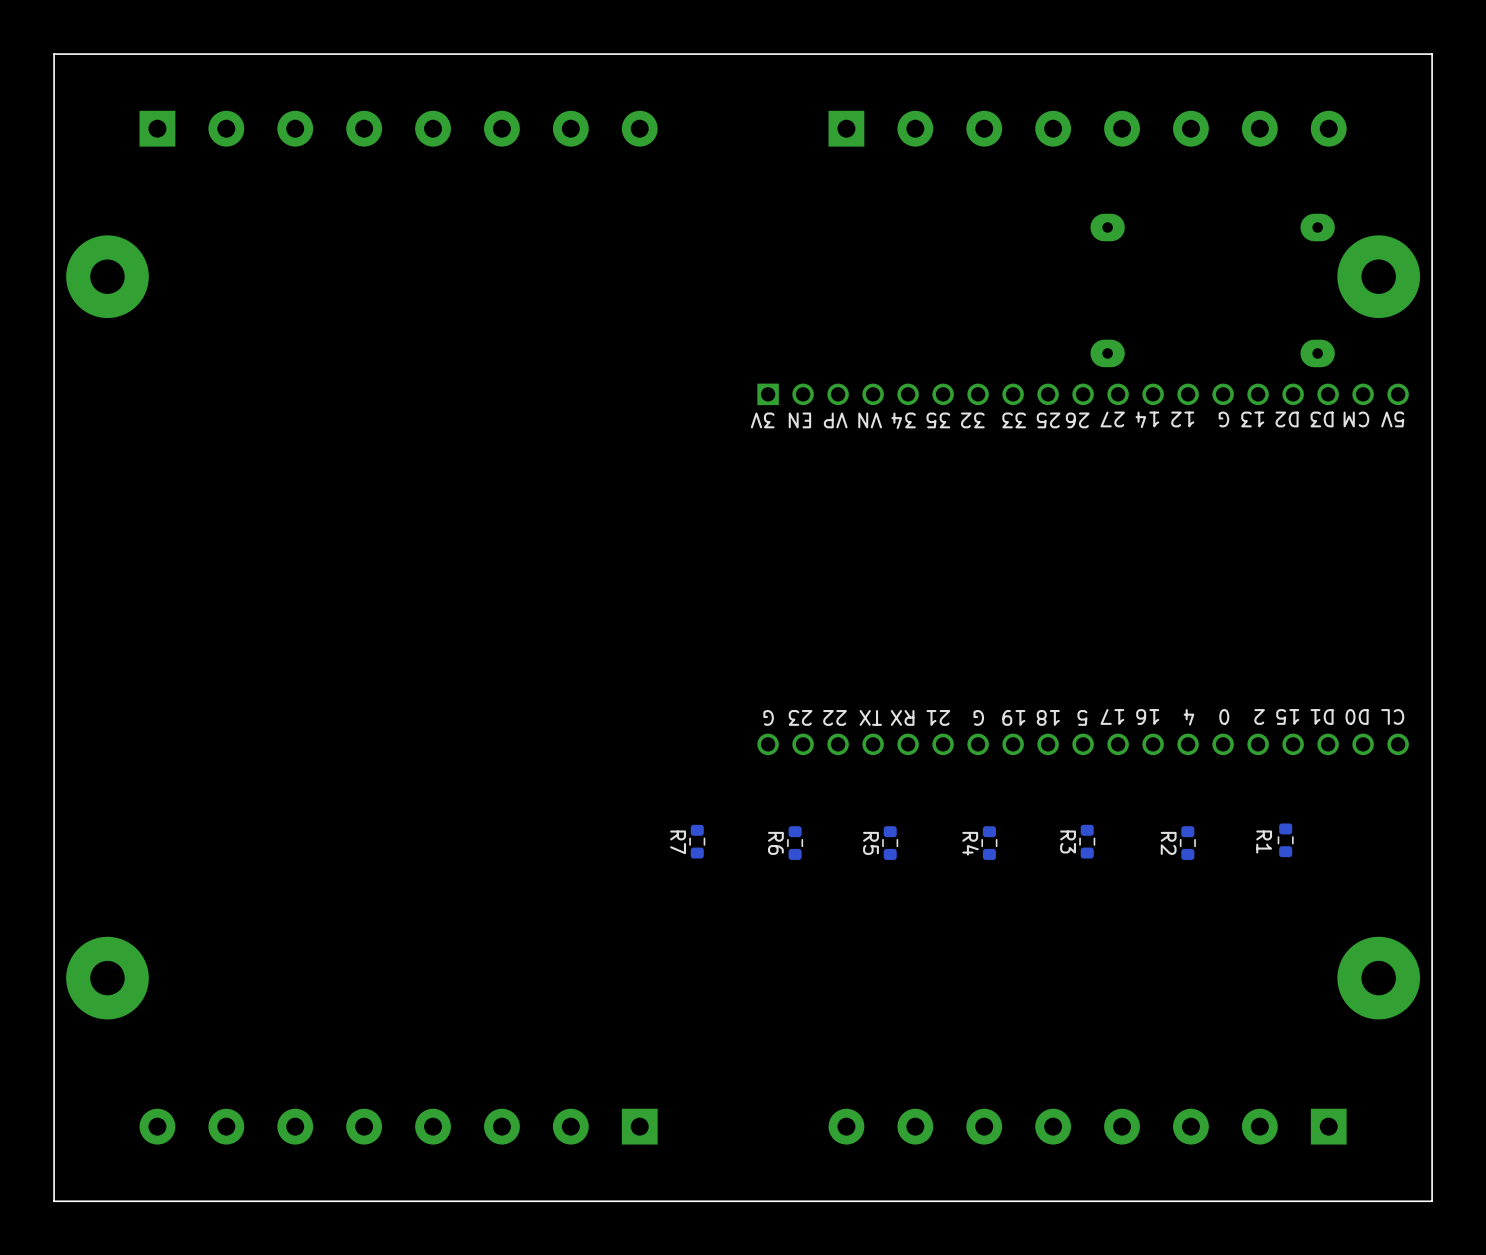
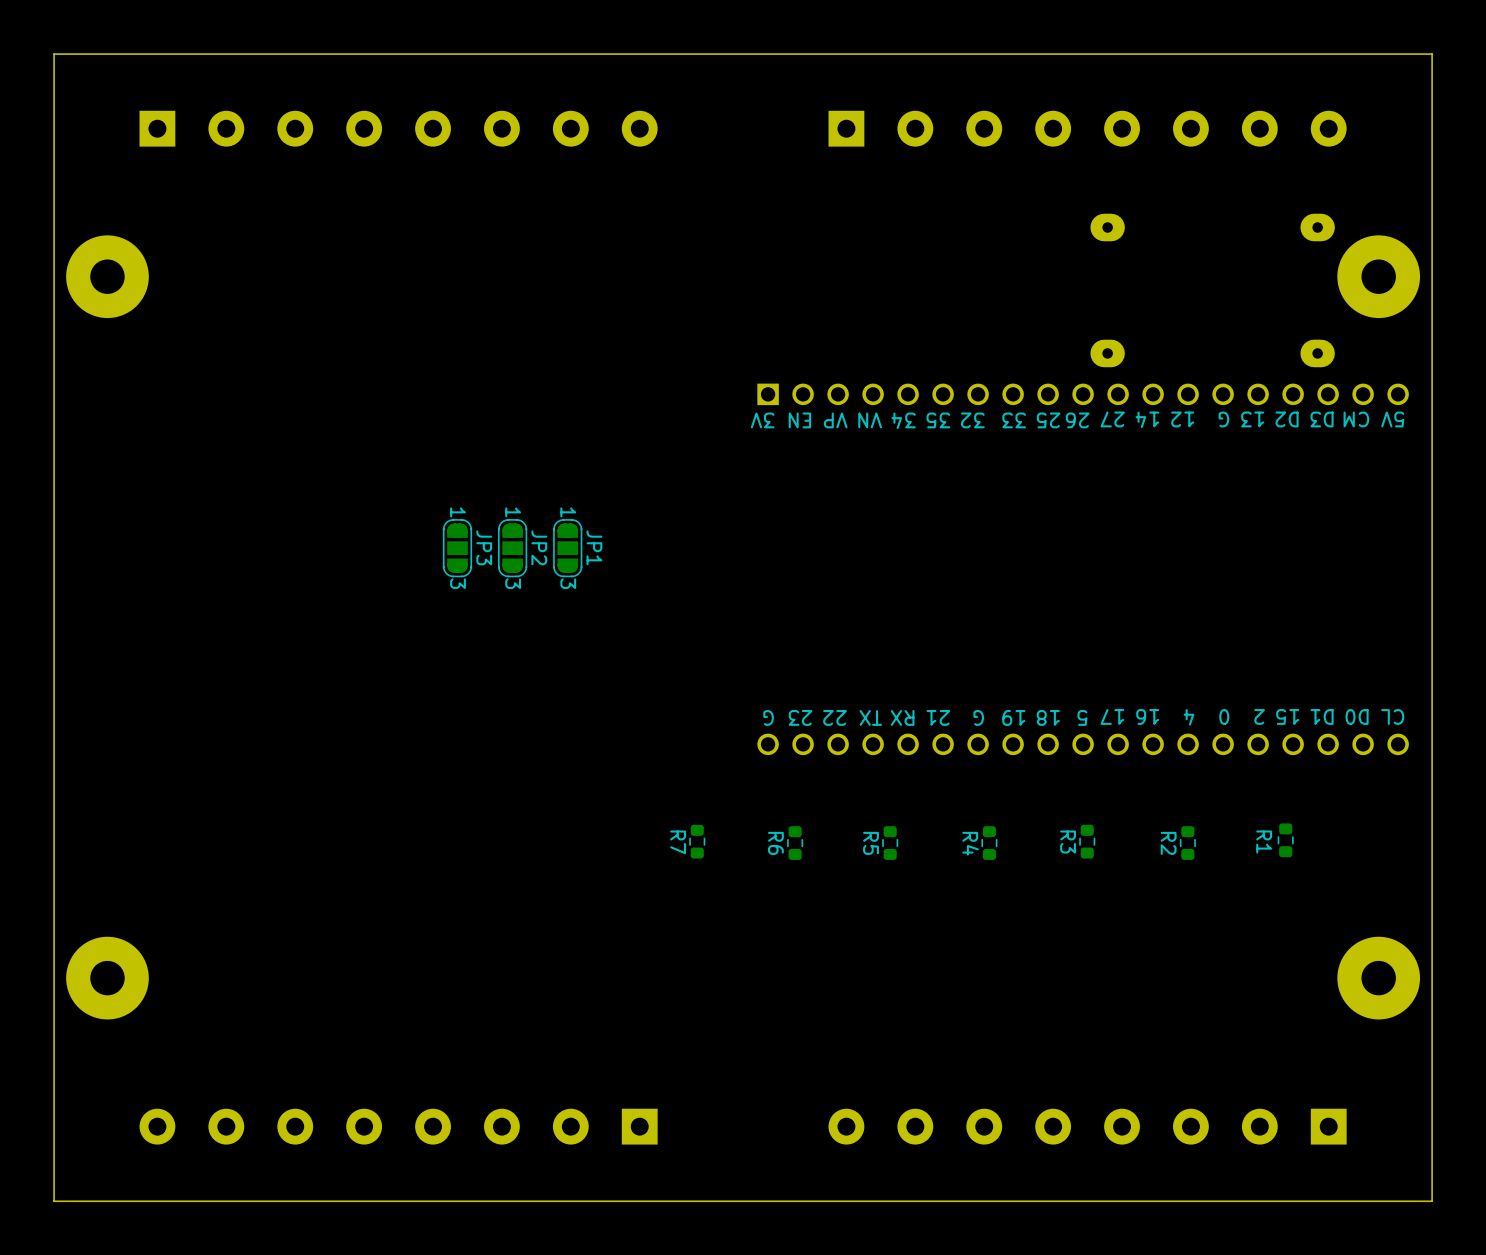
JP3: none -> (457, 548)
JP2: none -> (512, 548)
JP1: none -> (567, 548)

